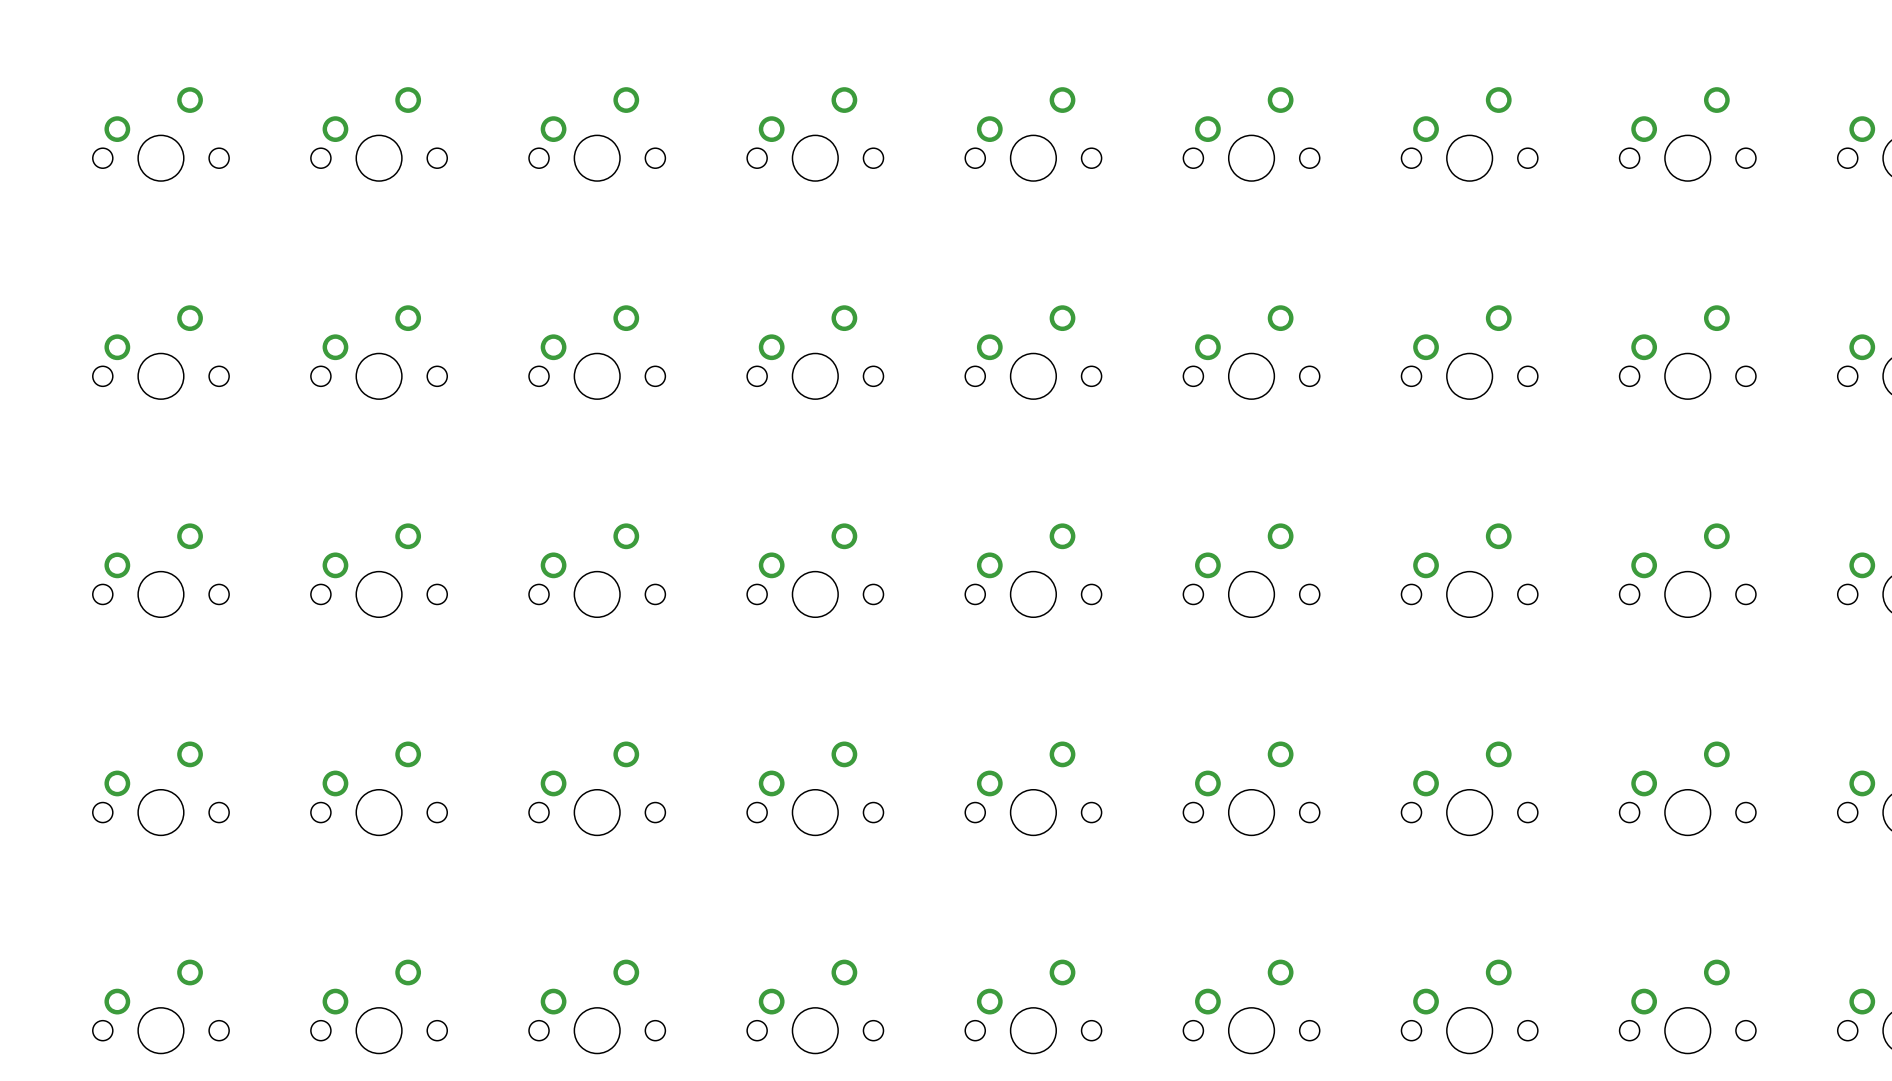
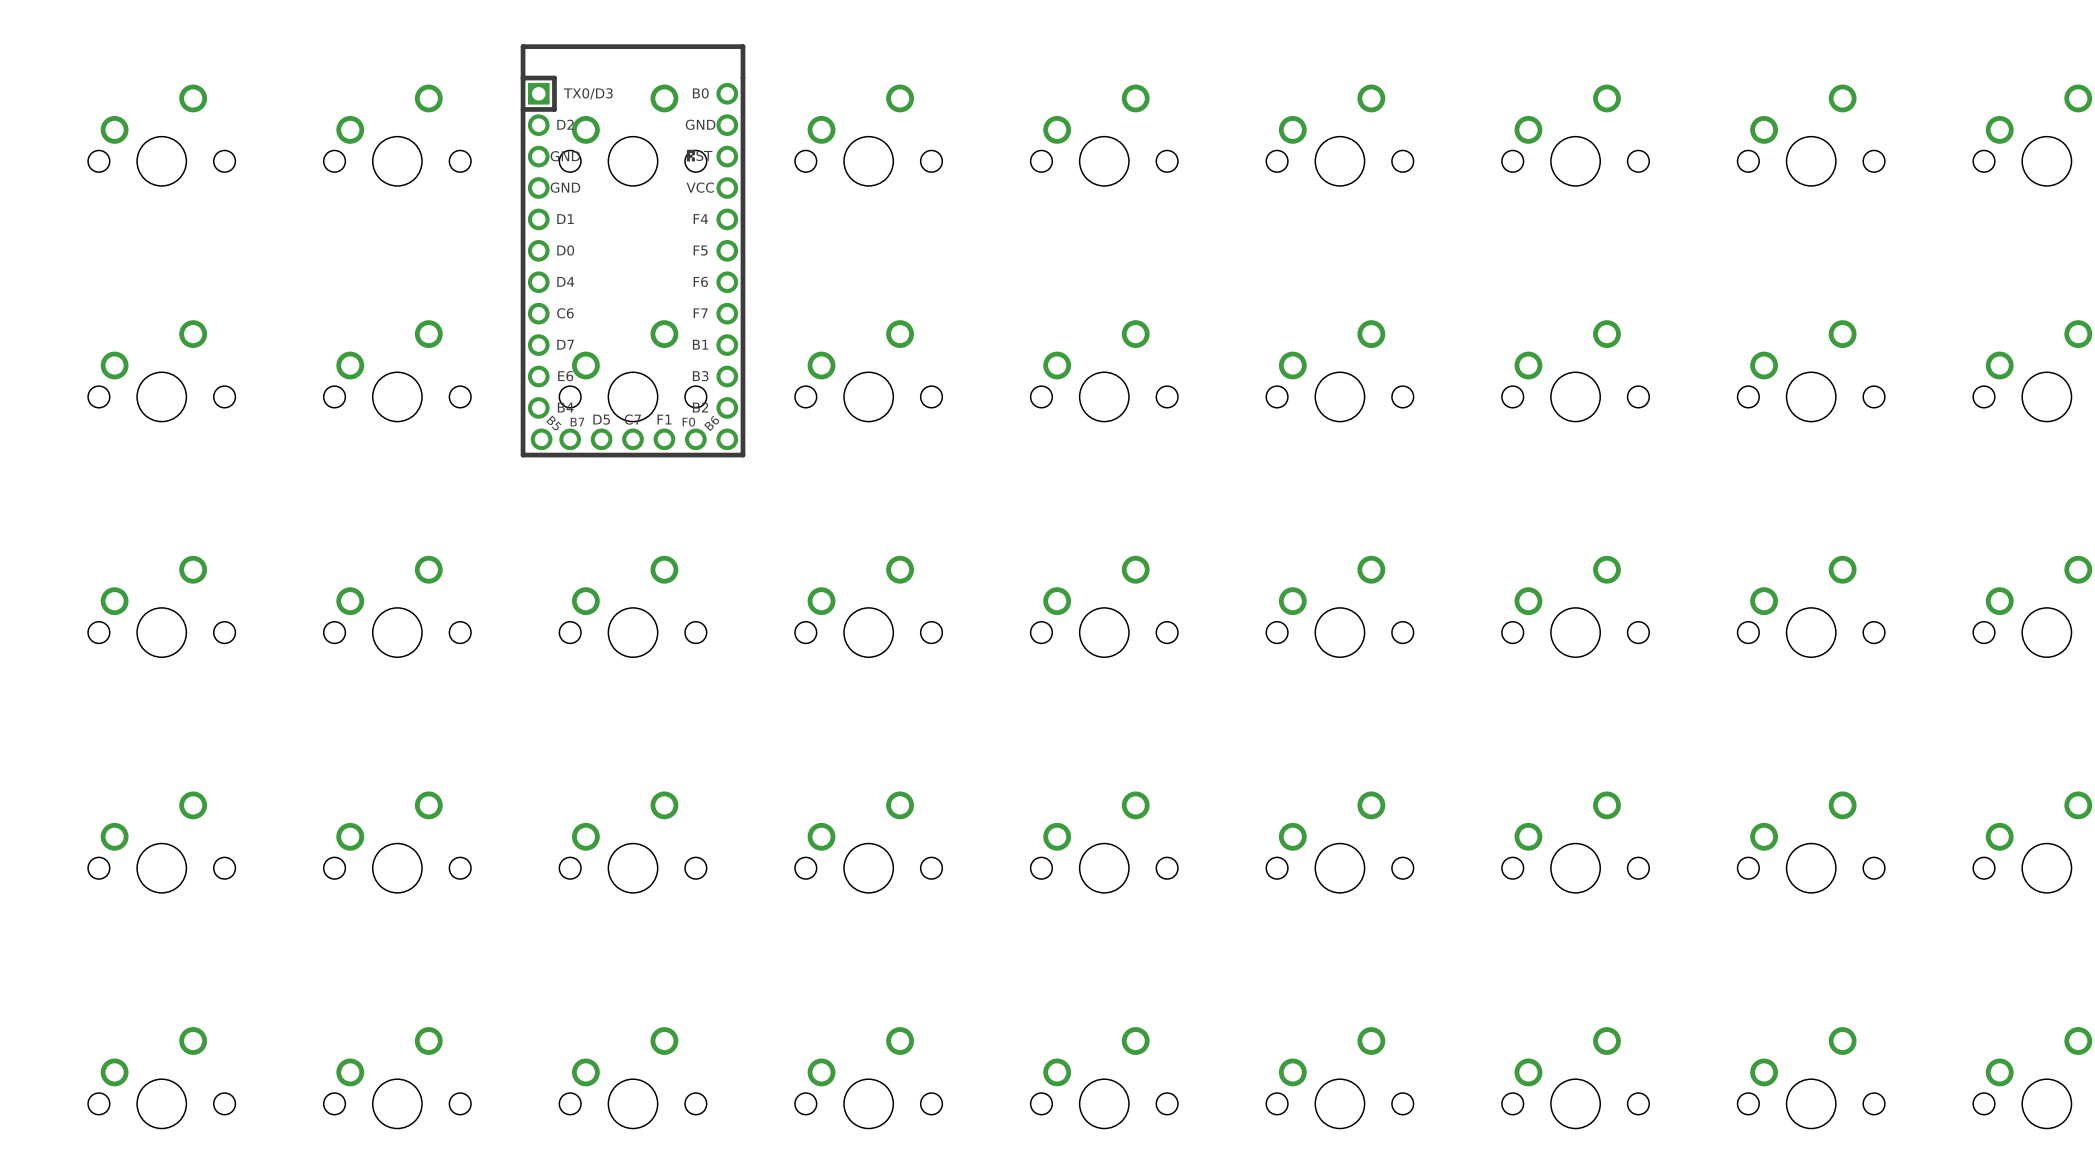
part: none -> (633, 250)

